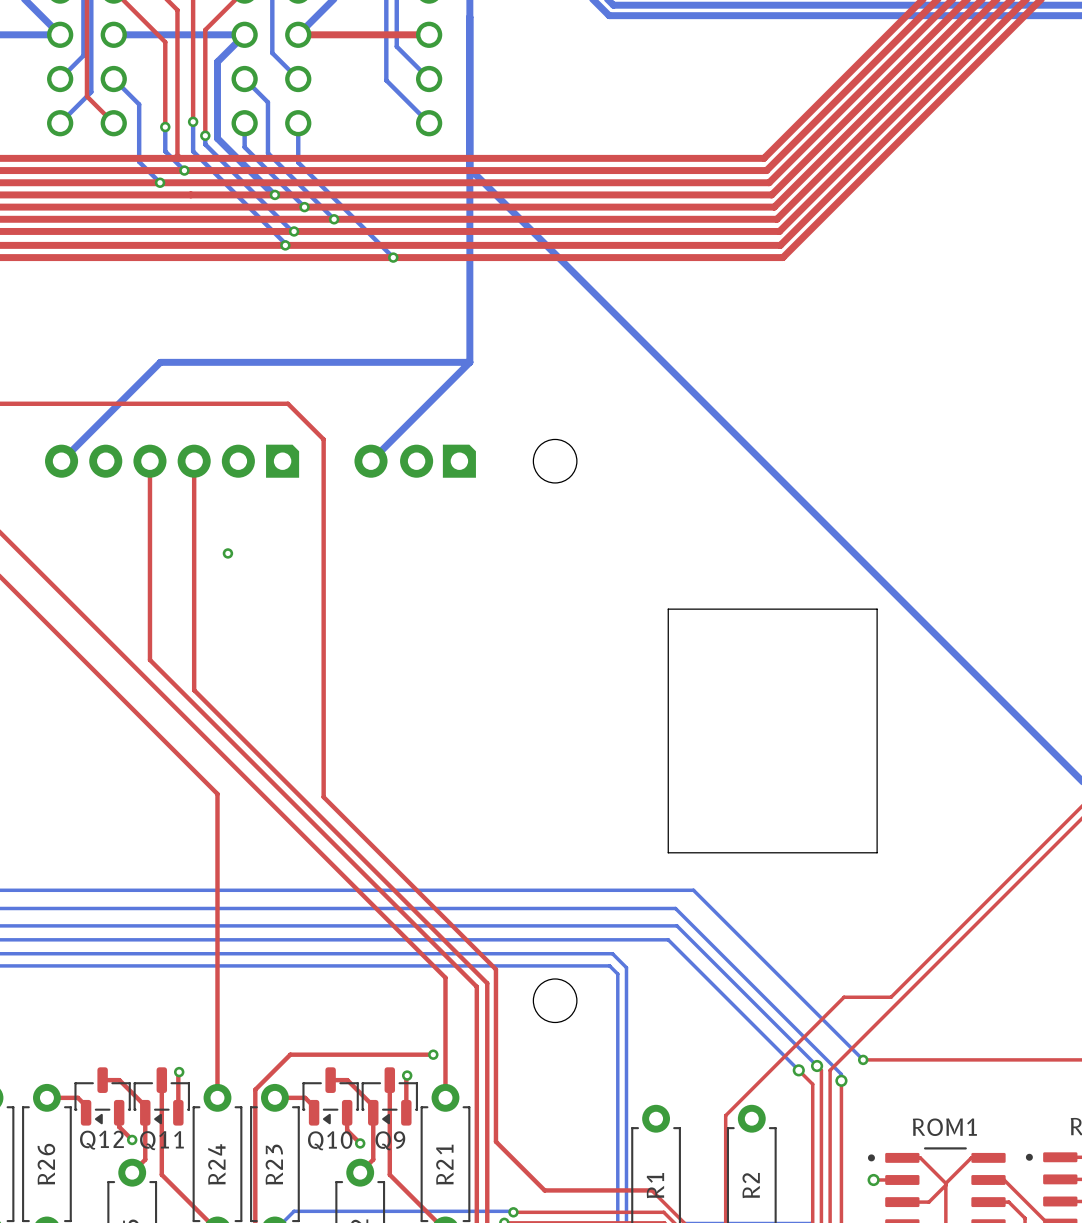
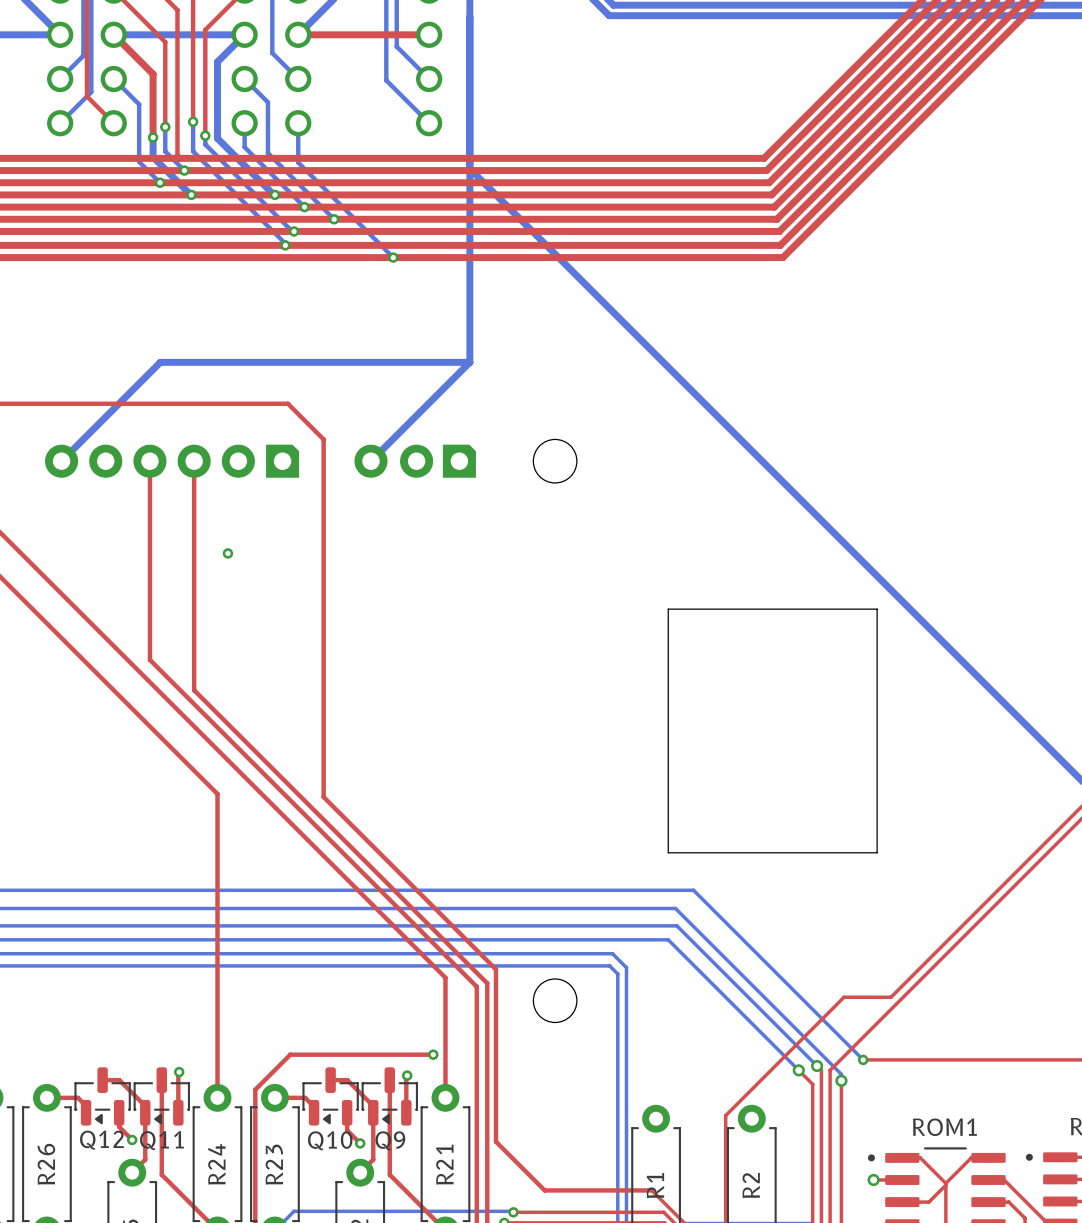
top track: none -> (113, 34) (153, 74) (153, 137)
bottom track: none -> (153, 137) (153, 157) (190, 194)
via: none -> (153, 137)
via: none -> (191, 194)

